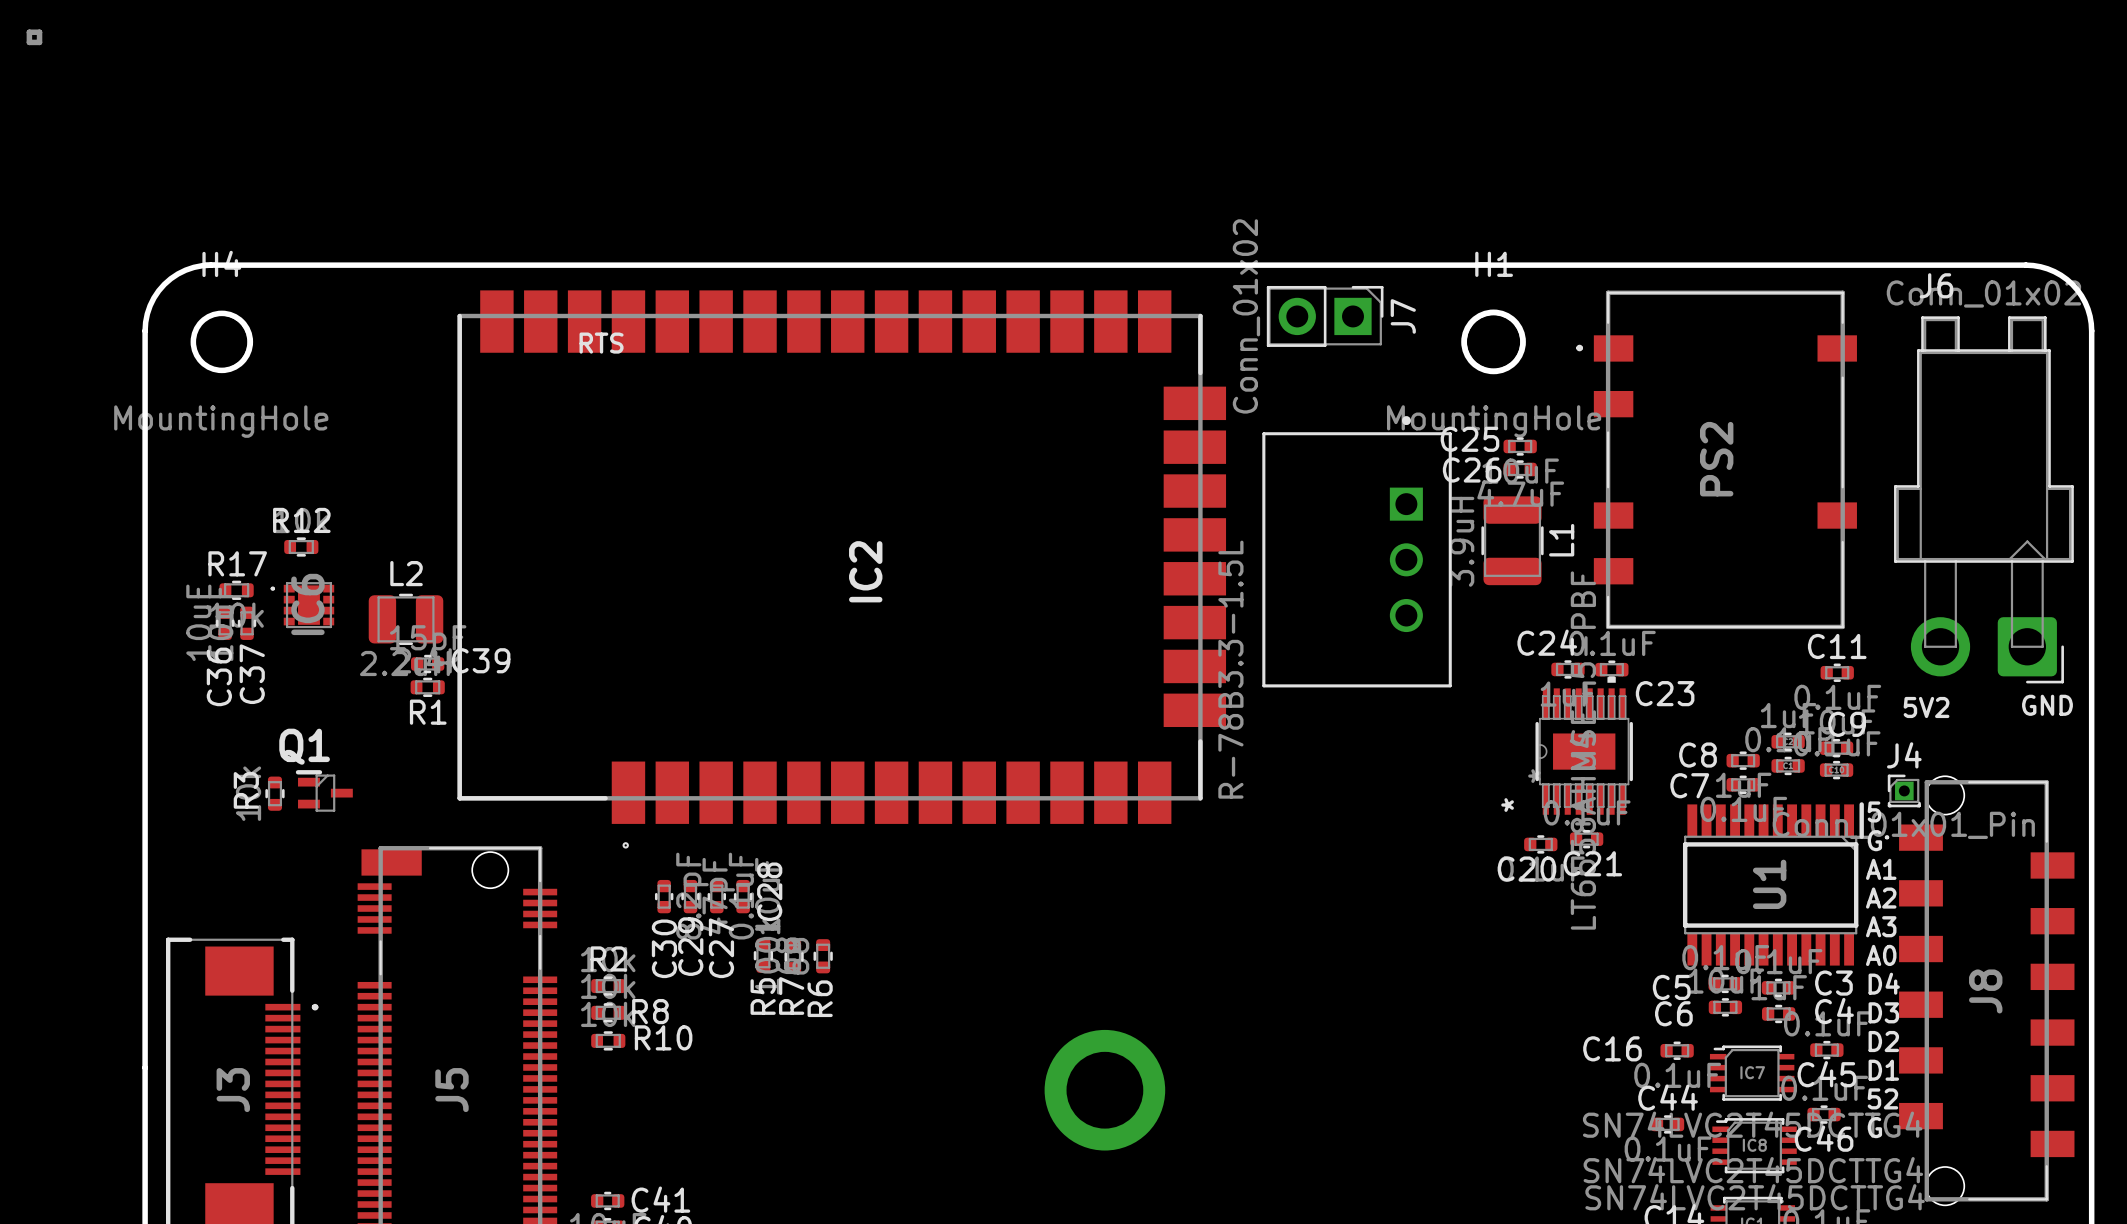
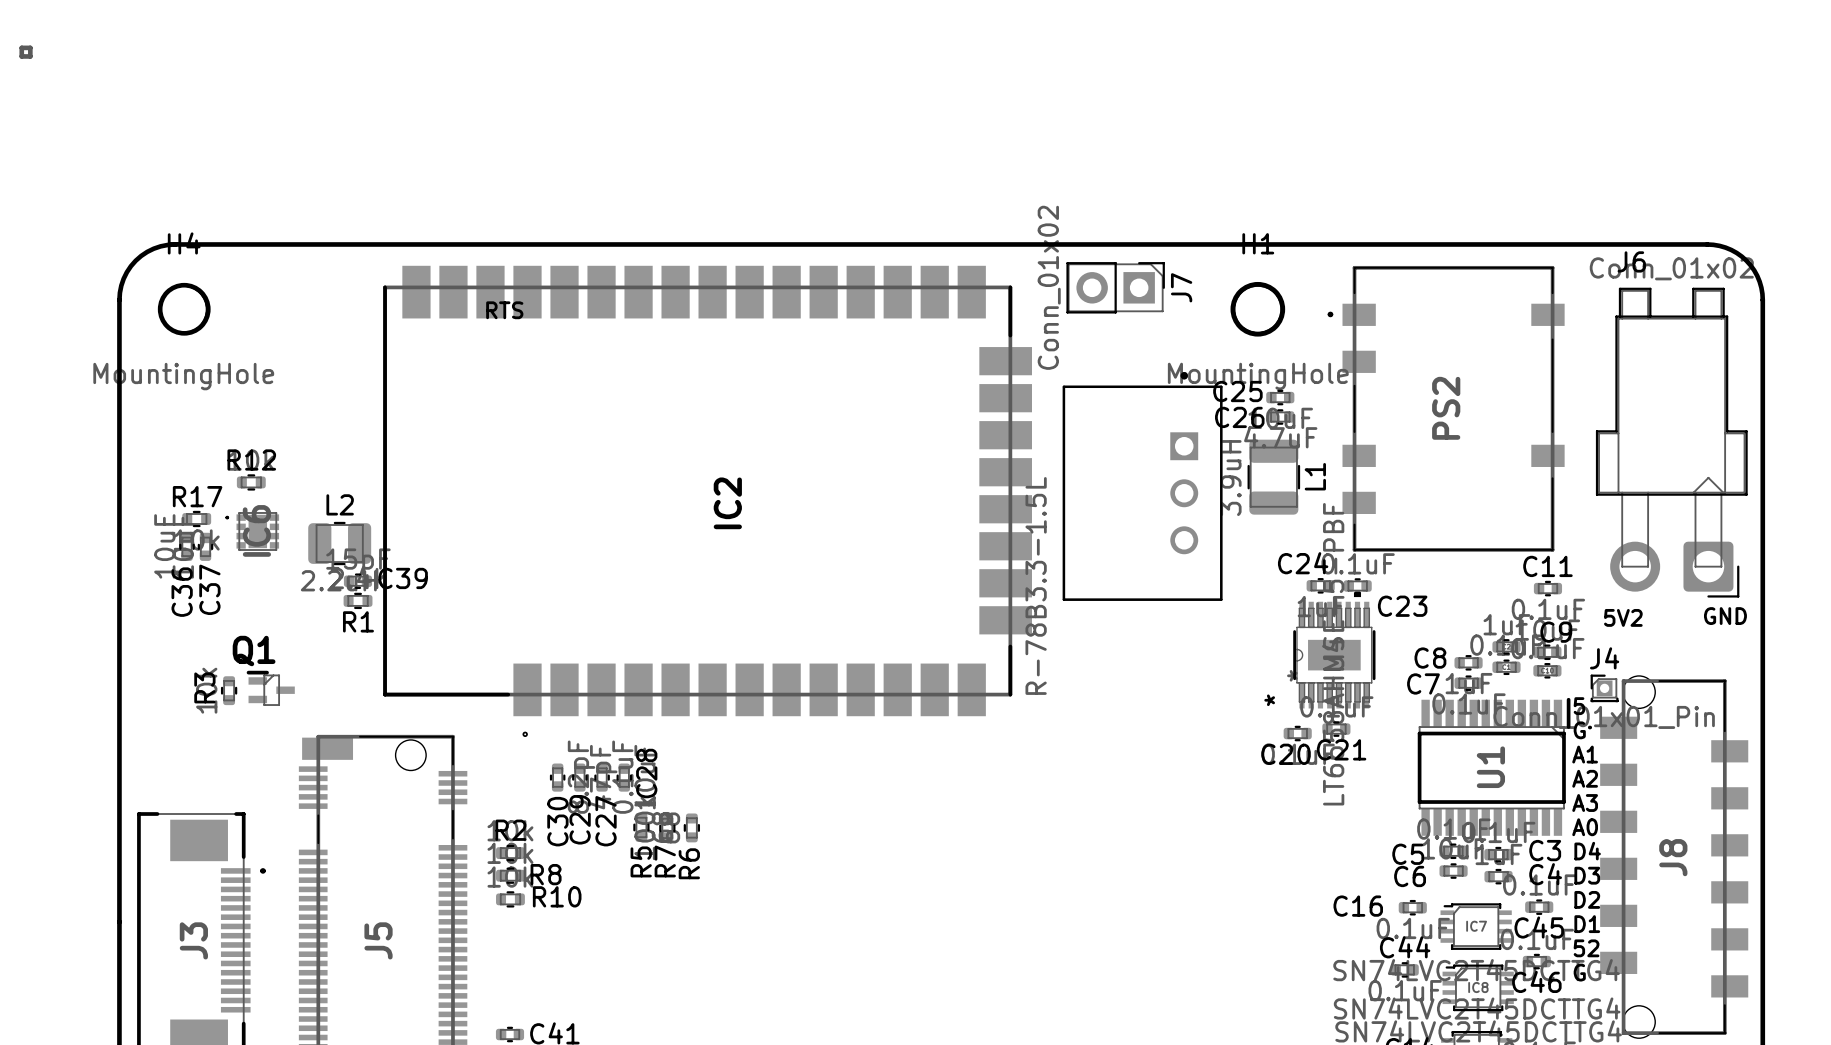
part: (1104, 1090) -> none

